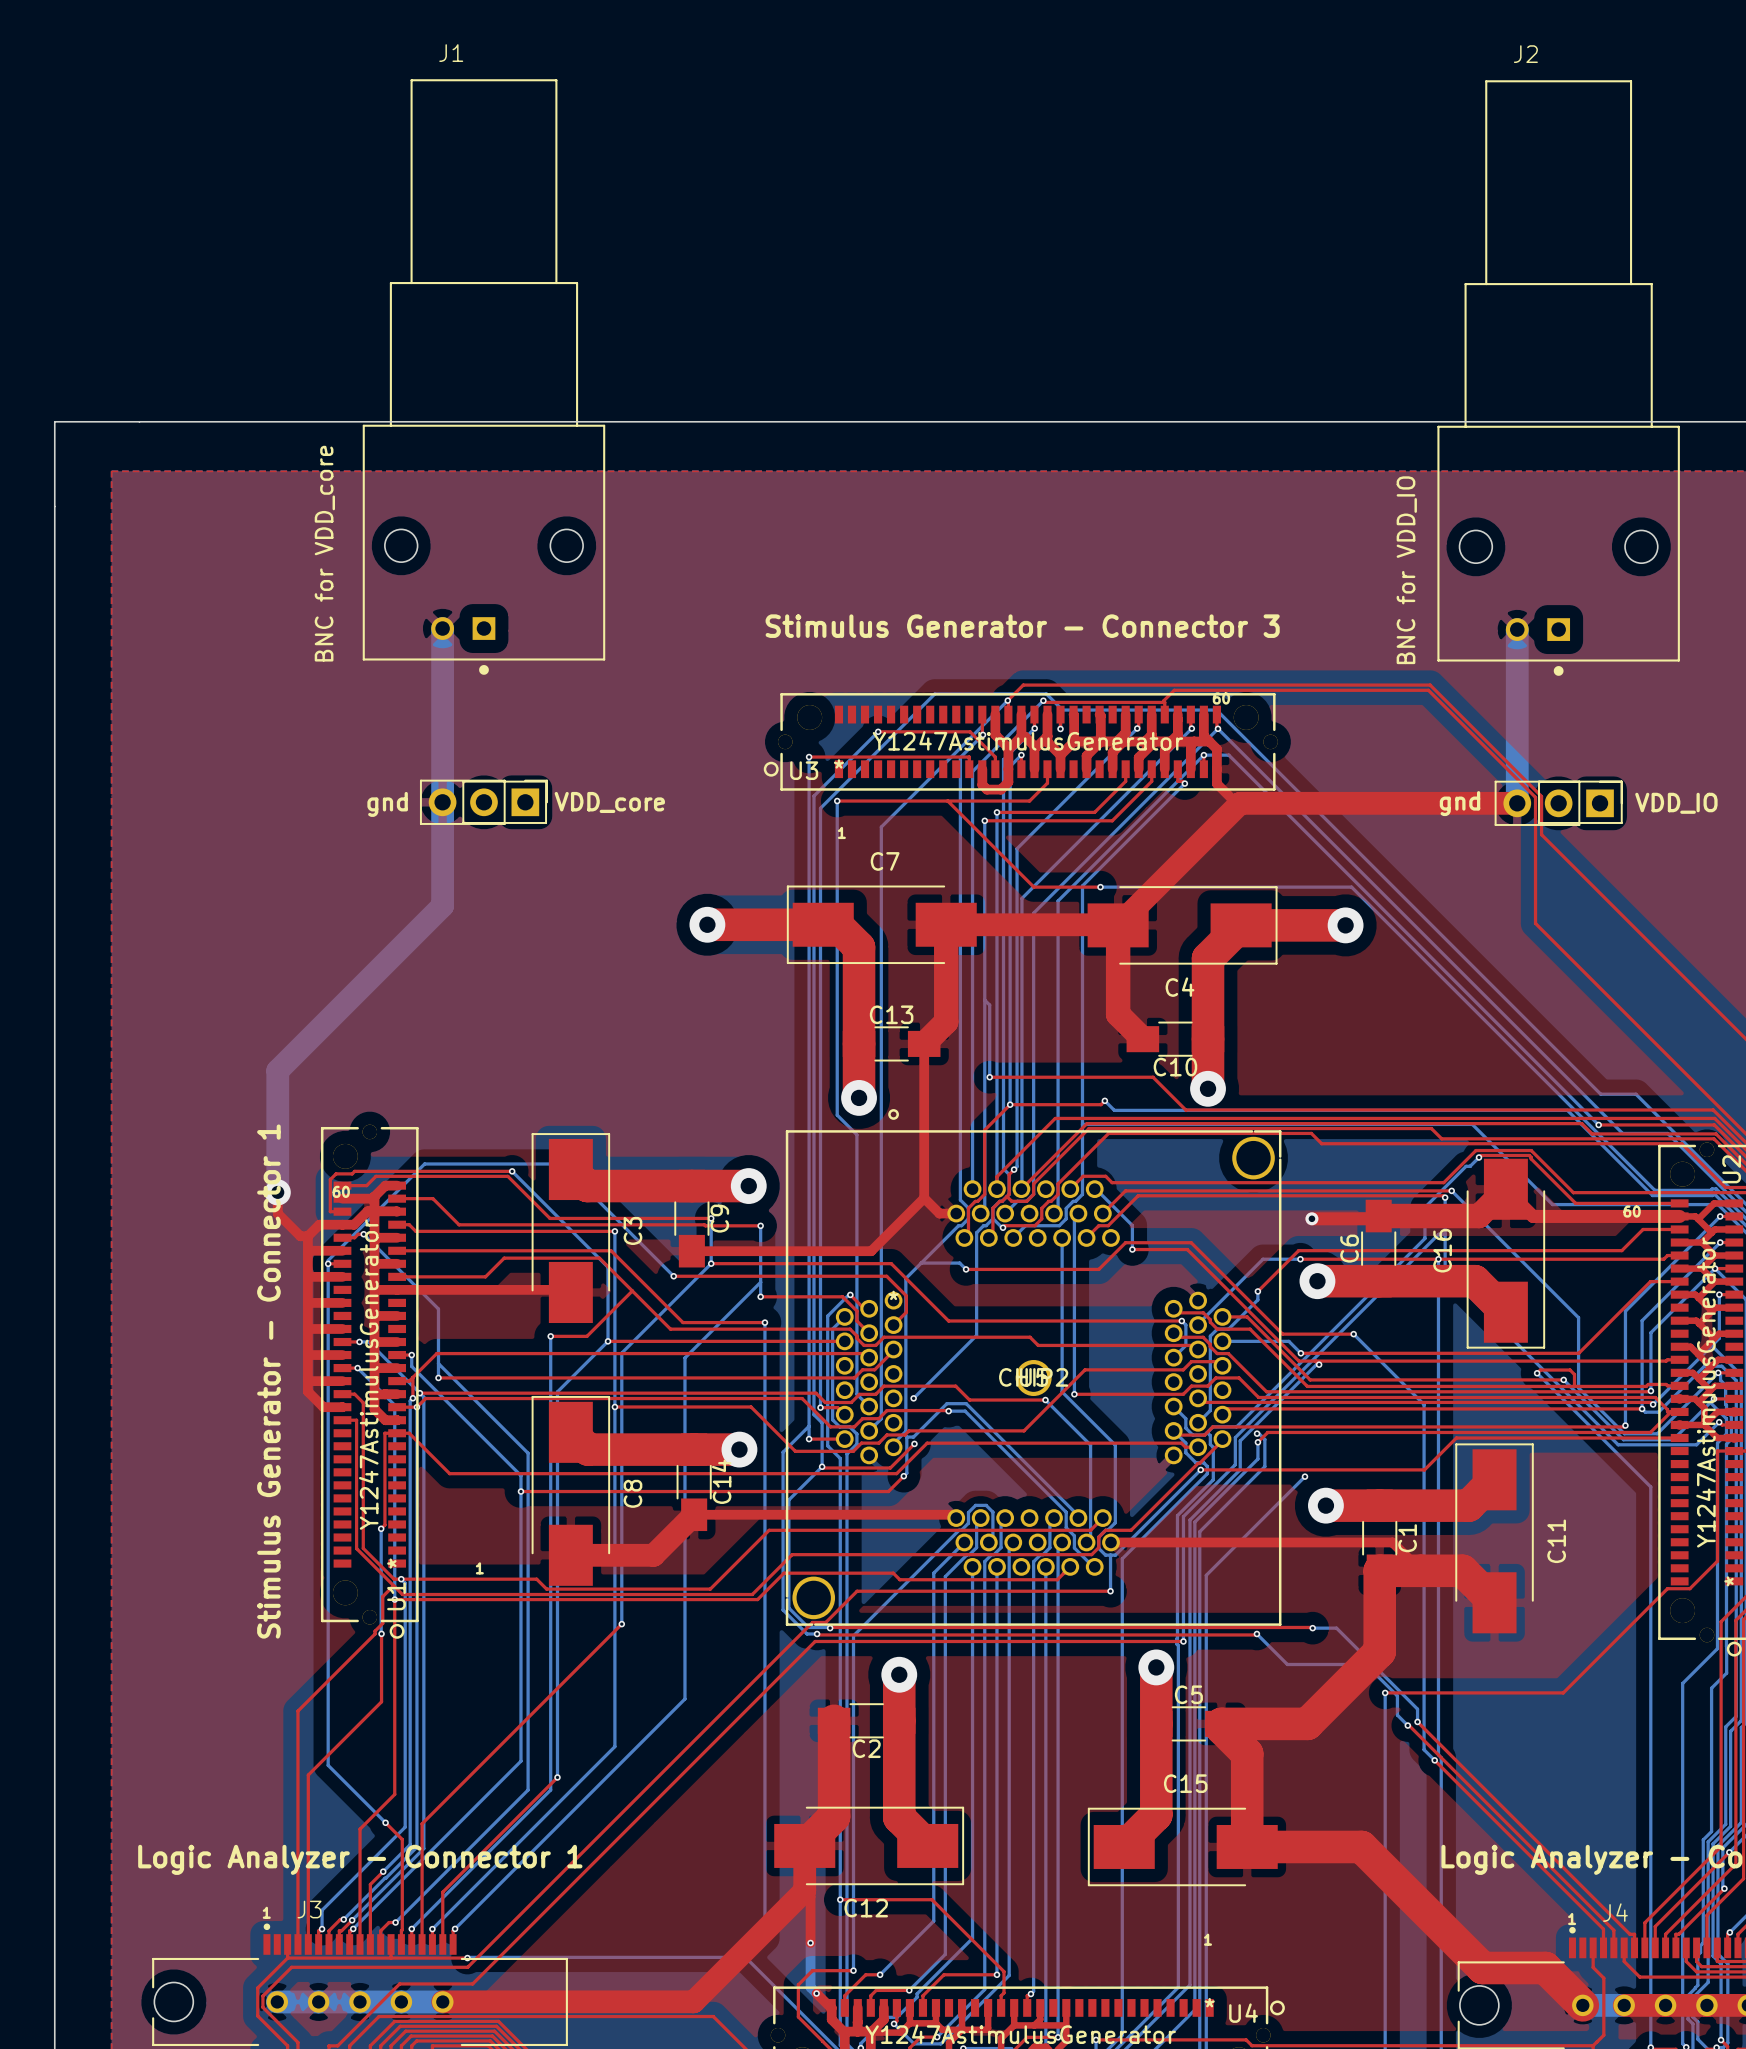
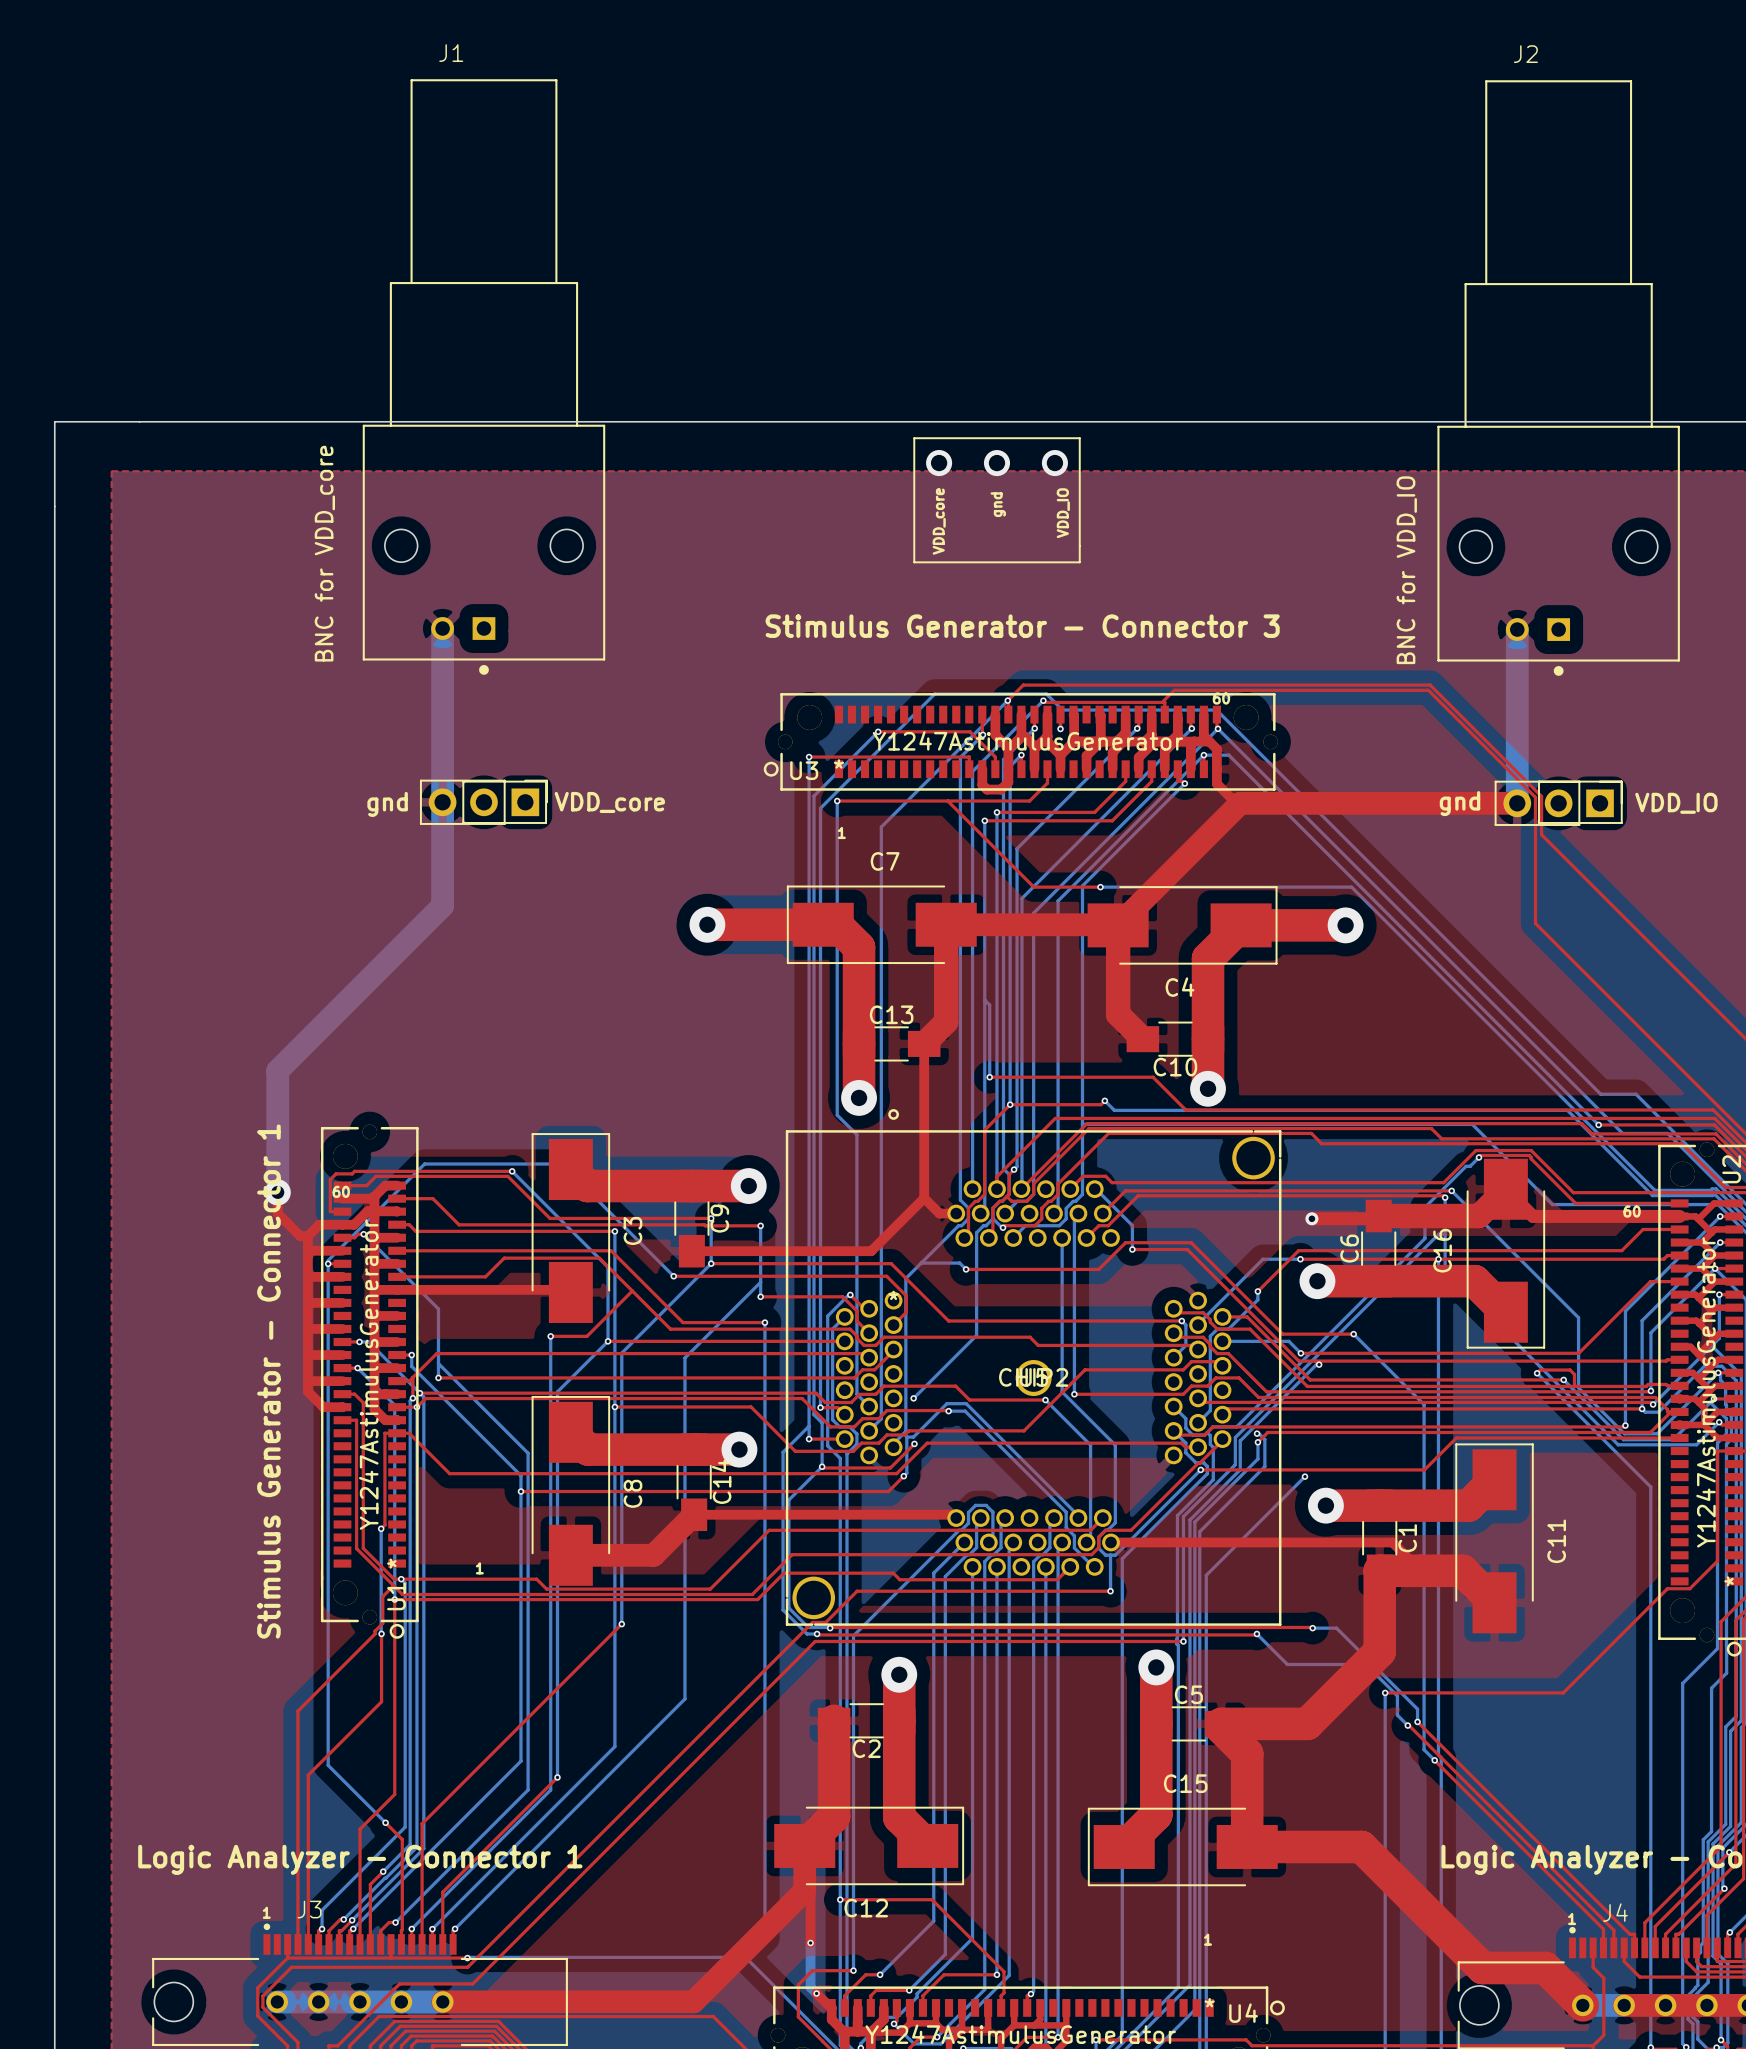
line: none -> (914, 438) (914, 562) (1079, 562) (1079, 438) (914, 438)
via: none -> (939, 463)
via: none -> (996, 463)
via: none -> (1054, 463)
text: none -> gnd (998, 504)
text: none -> VDD_IO (1063, 513)
text: none -> VDD_core (939, 521)

